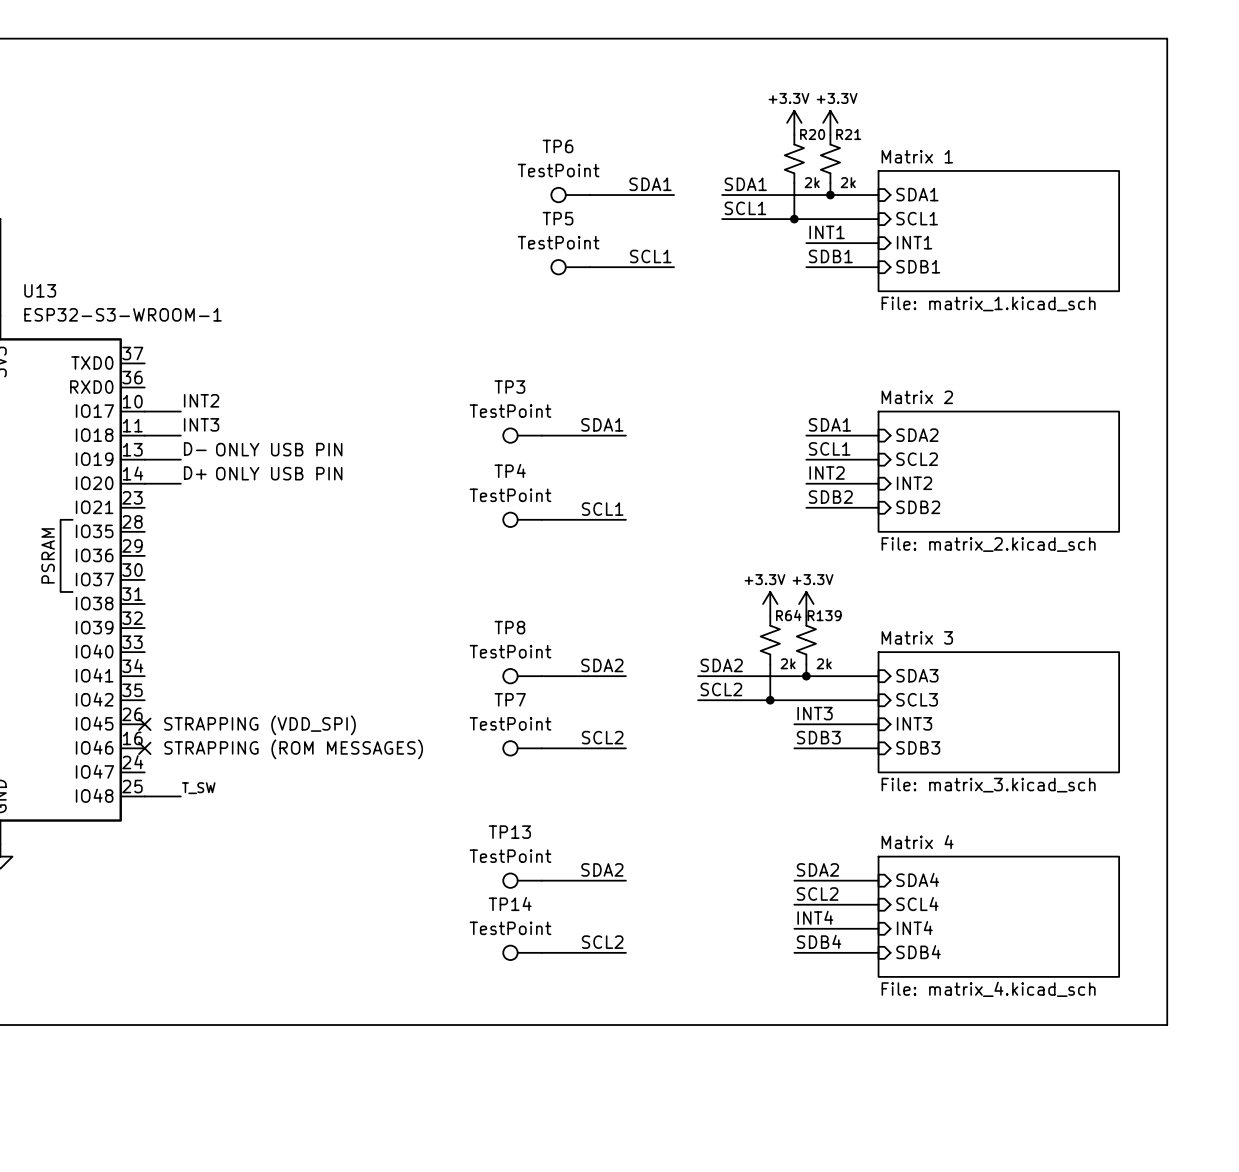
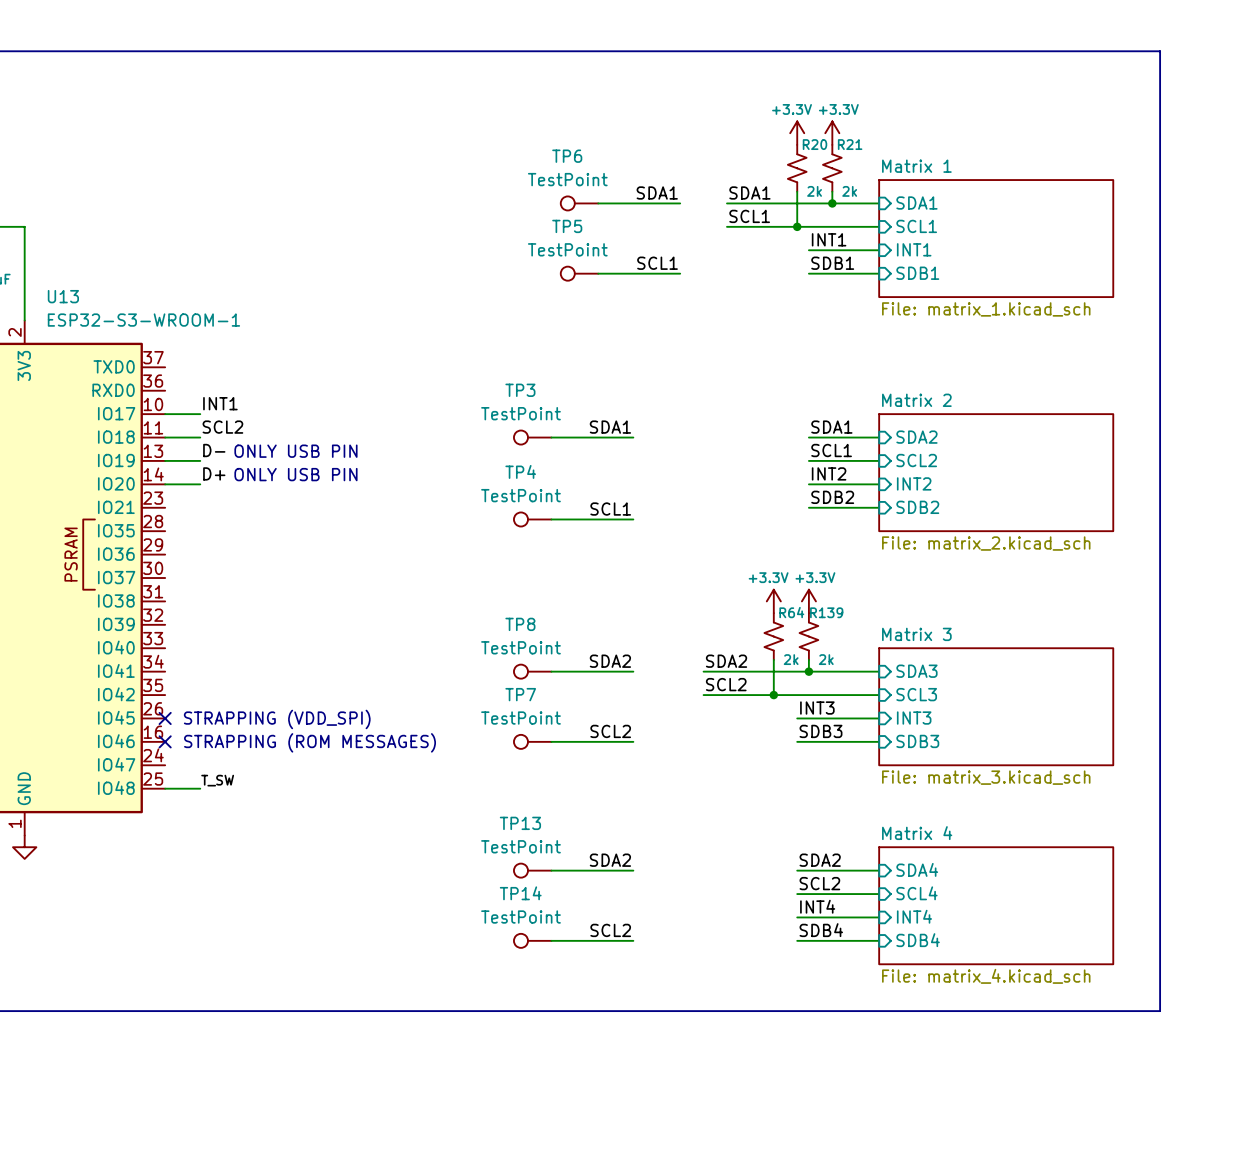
label: INT2 (201, 400) -> INT1 (220, 403)
label: INT3 (201, 424) -> SCL2 (222, 427)

